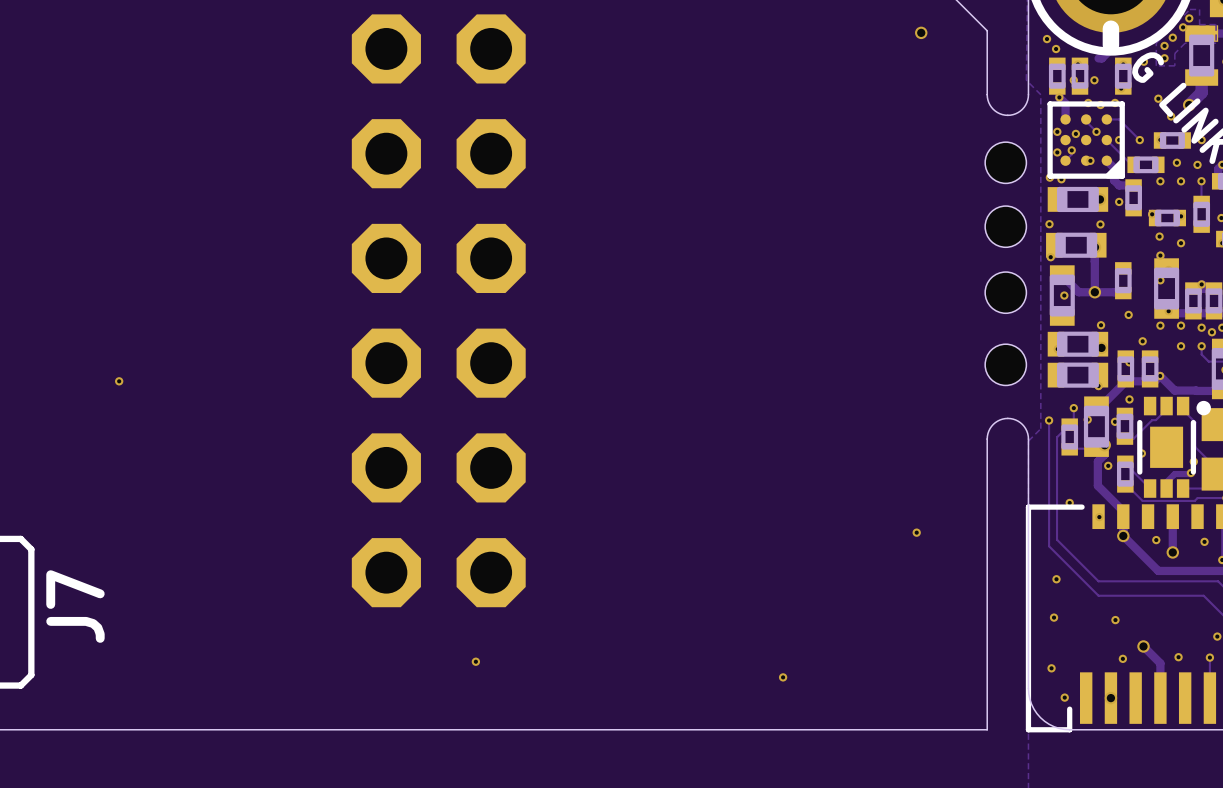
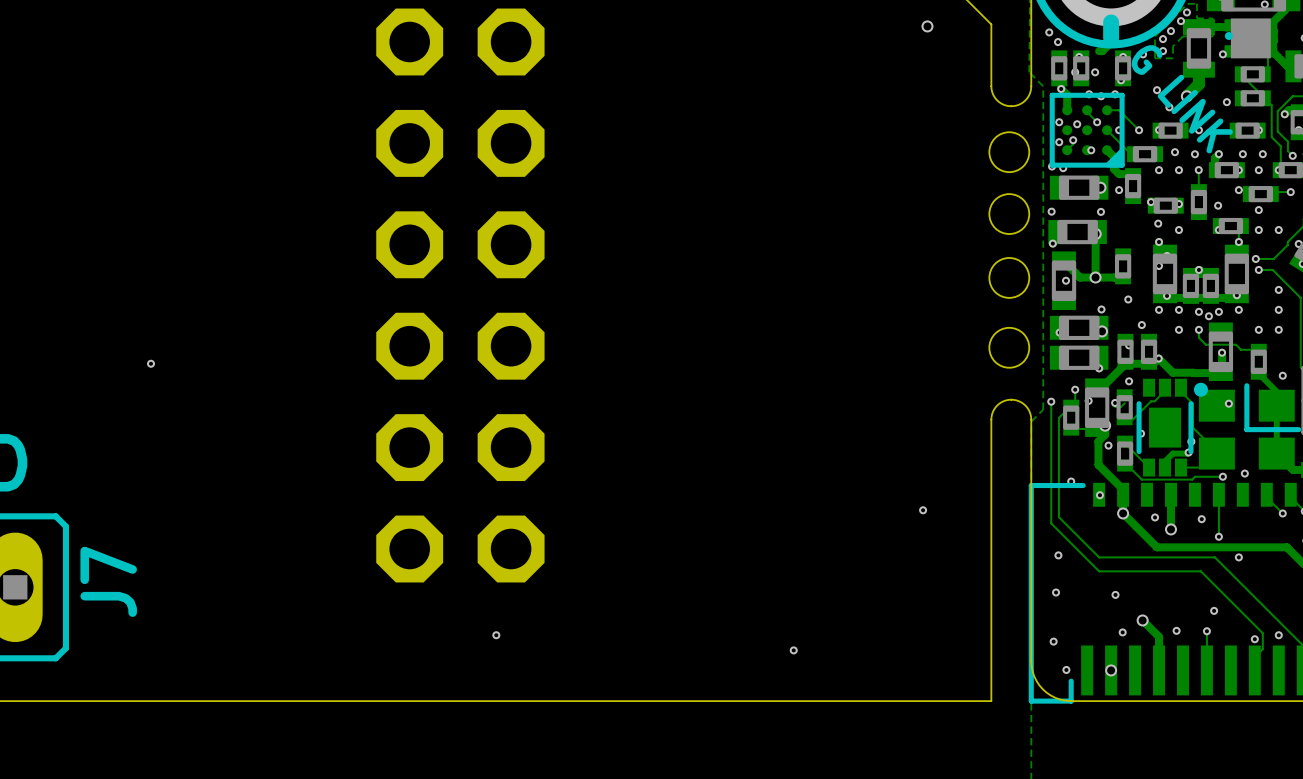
track: none -> (1124, 403) (1121, 406) (1115, 406)

